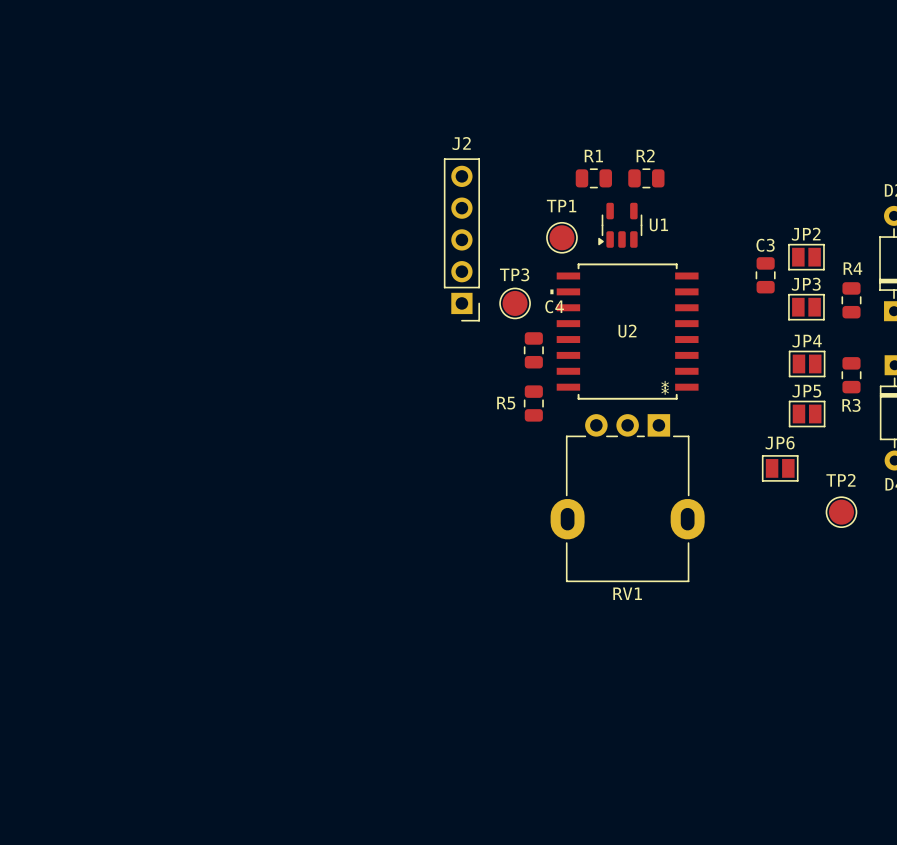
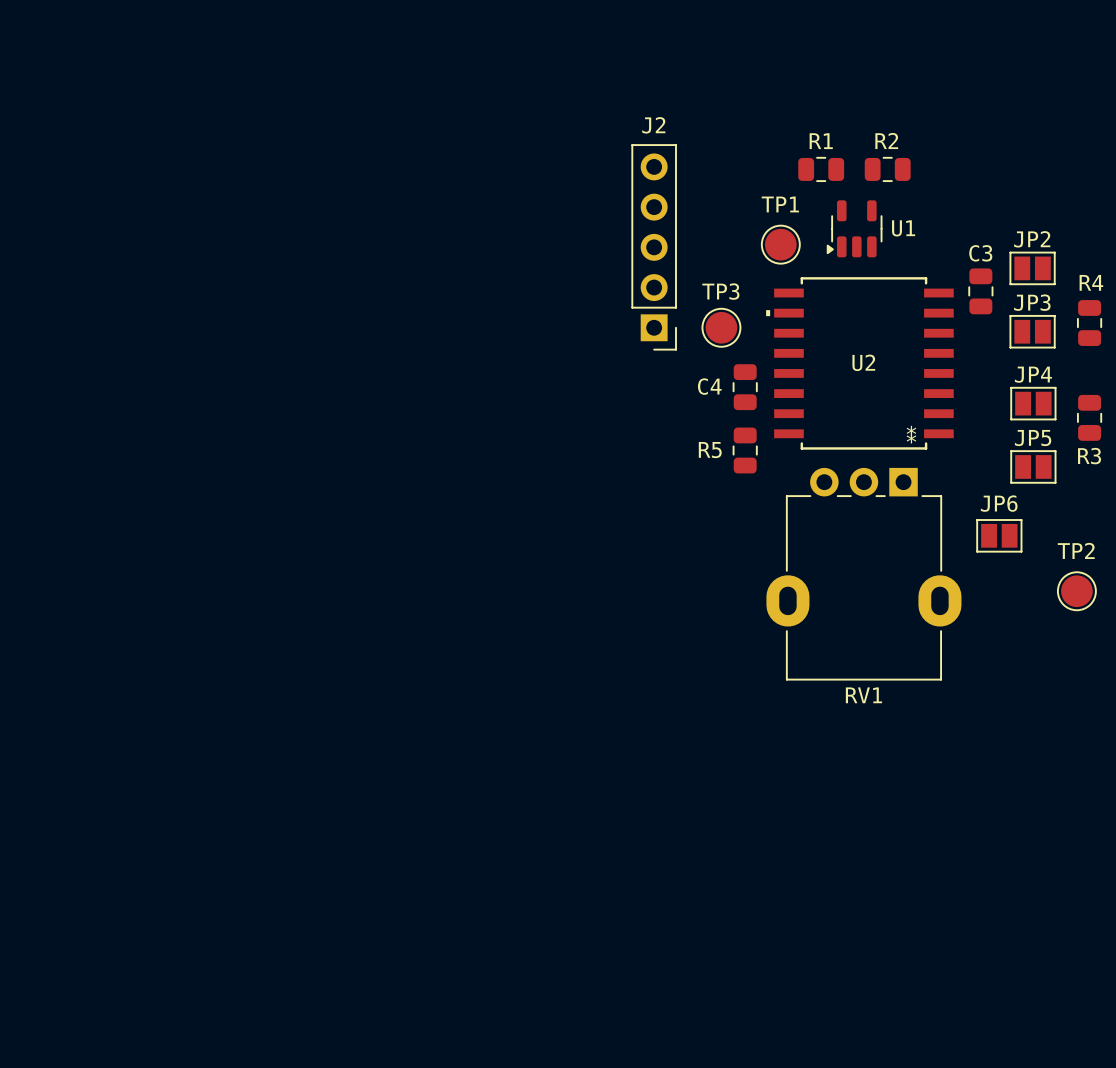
R1 position: (593, 178) -> (821, 169)
R2 position: (646, 178) -> (887, 169)
U1 position: (620, 225) -> (854, 228)
TP1 position: (561, 237) -> (780, 244)
J2 position: (461, 239) -> (654, 247)
TP3 position: (515, 303) -> (721, 327)
C4 name position: C4 (554, 306) -> C4 (709, 386)
U2 position: (624, 331) -> (859, 363)
C4 position: (533, 350) -> (745, 387)
R5 position: (533, 403) -> (745, 450)
RV1 position: (627, 498) -> (863, 574)

